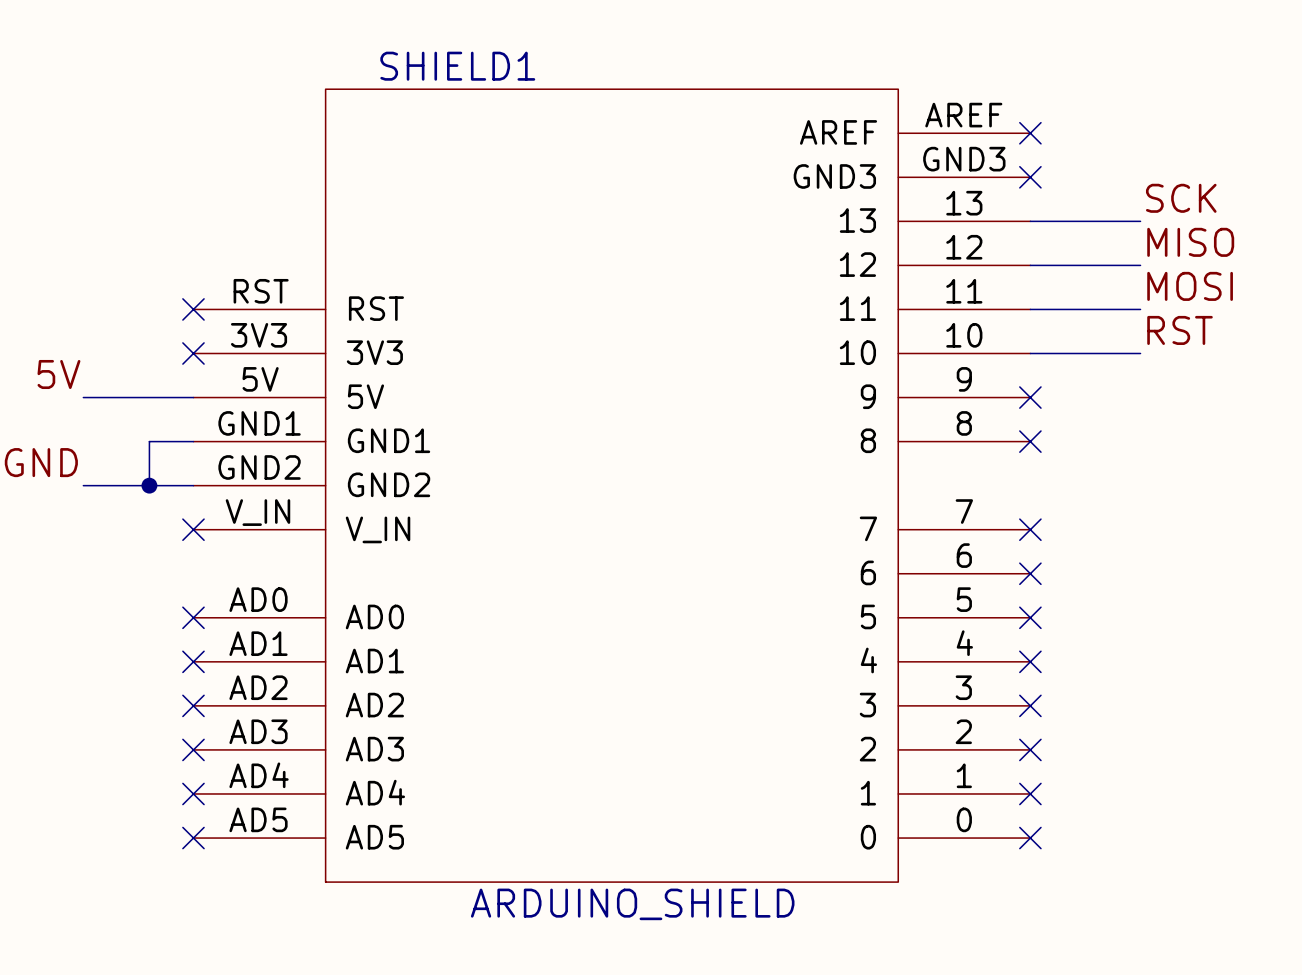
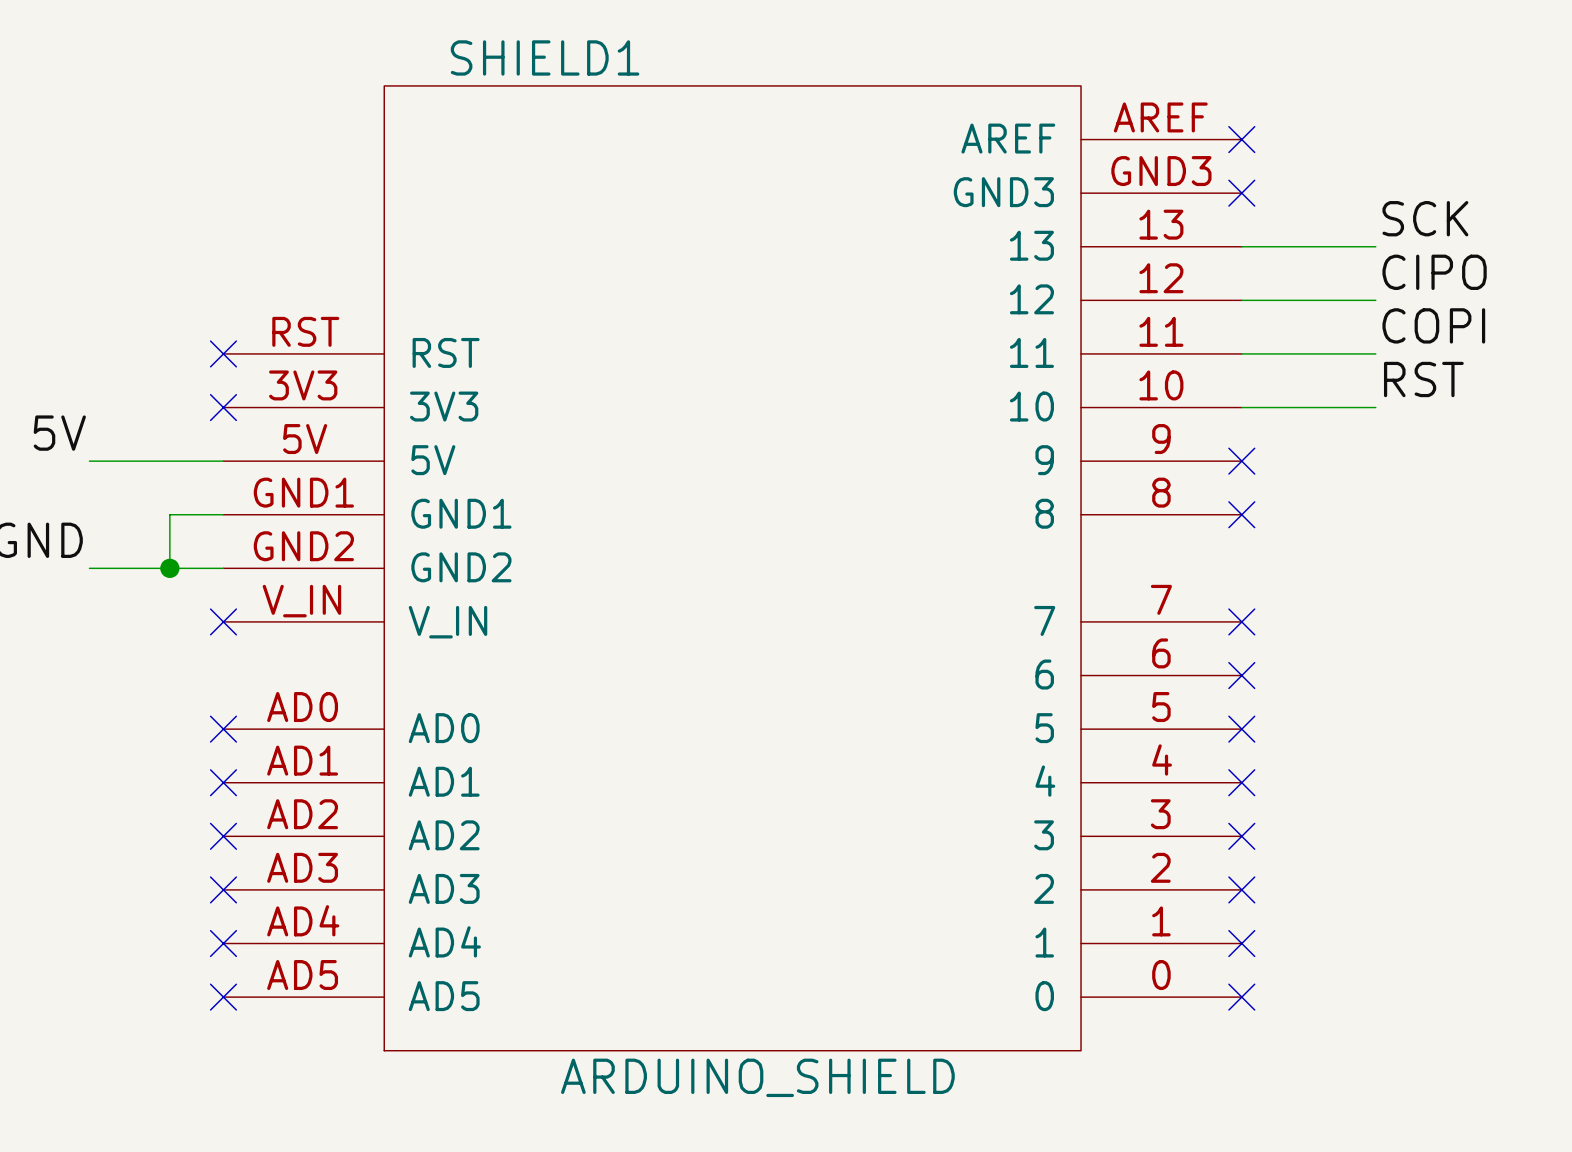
label: MISO (1190, 242) -> CIPO (1434, 272)
label: MOSI (1190, 286) -> COPI (1433, 325)

